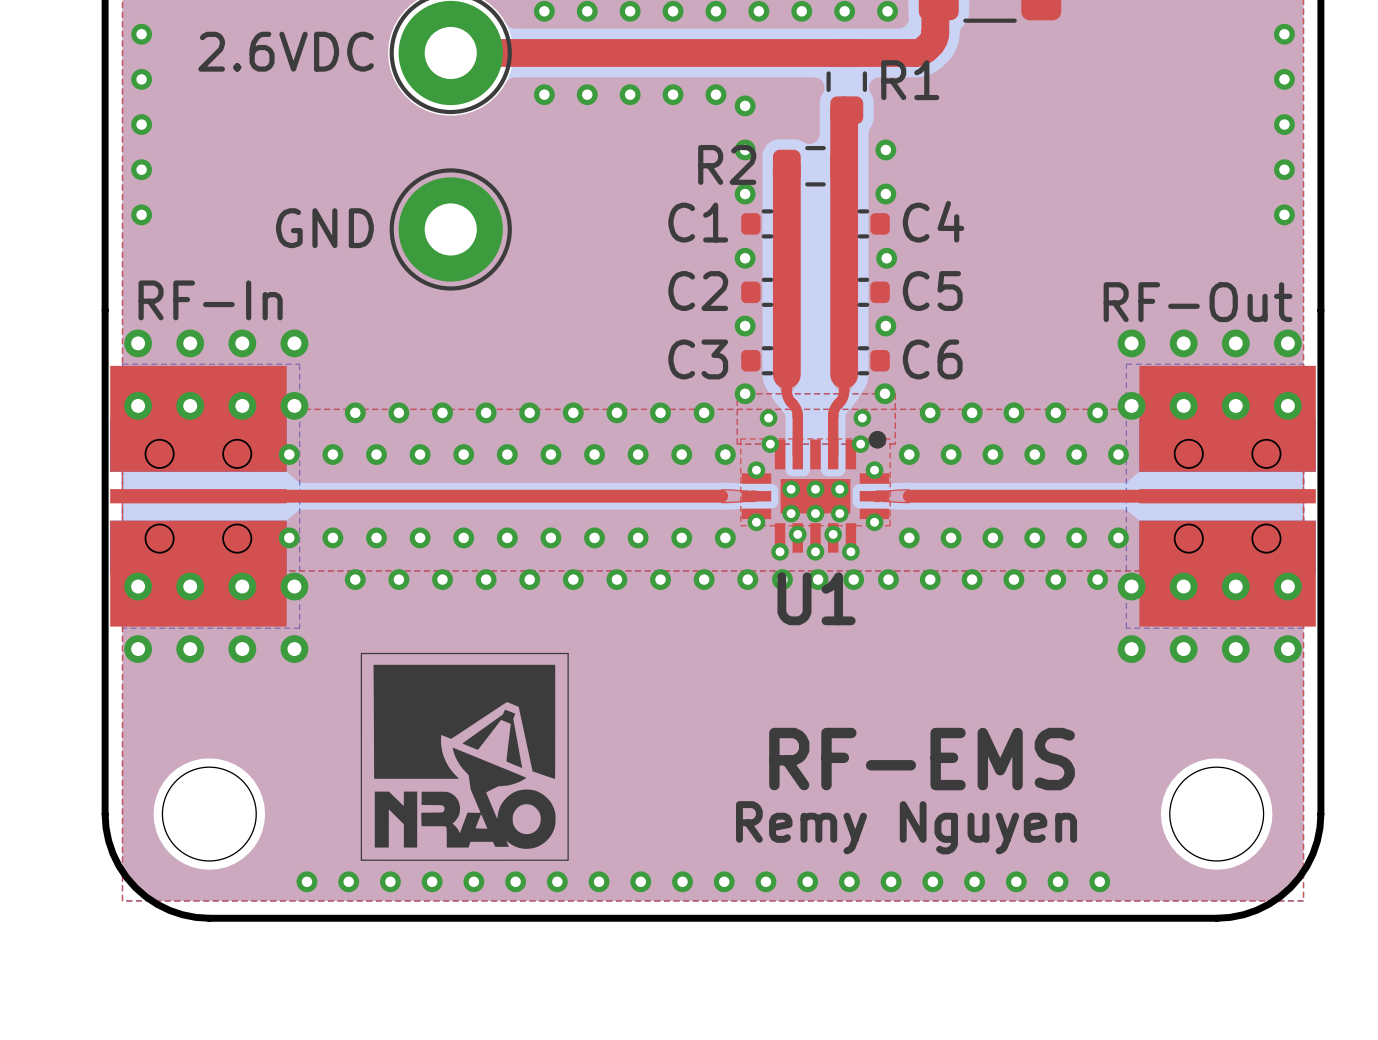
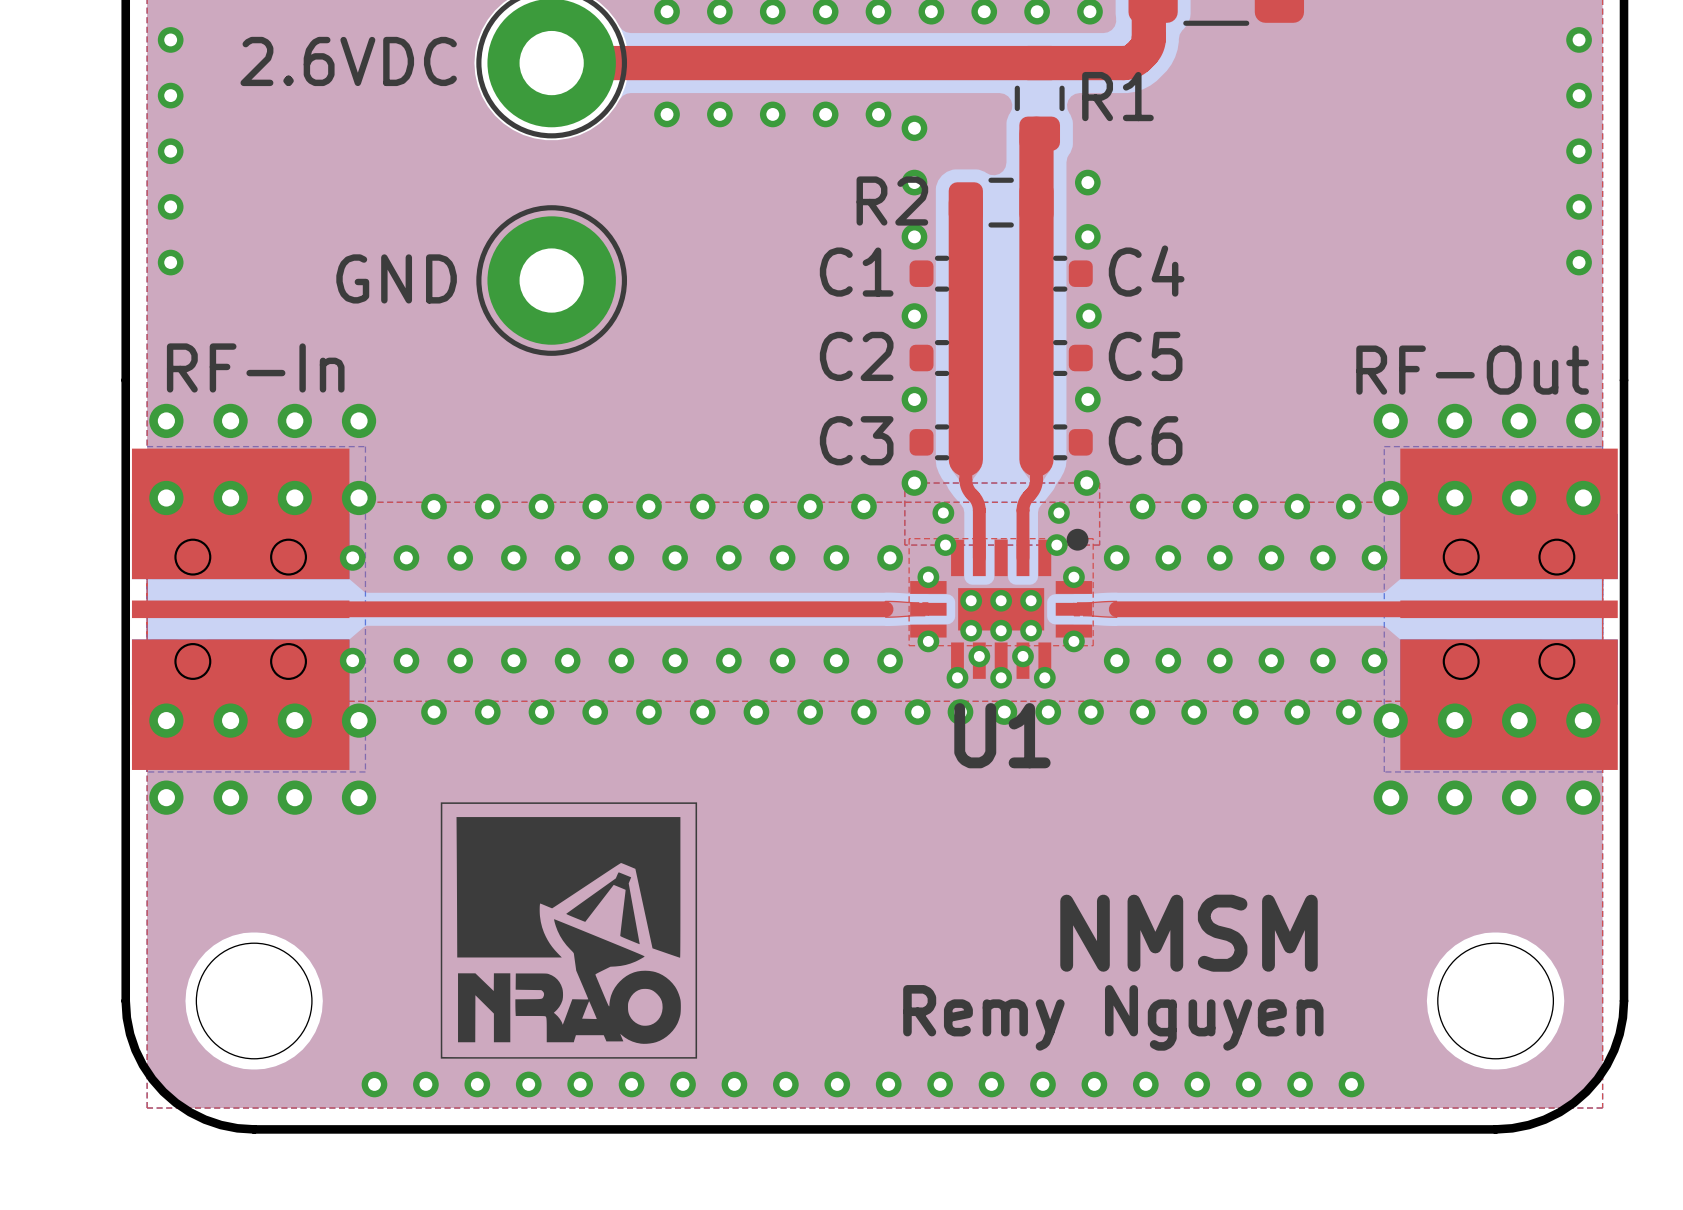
text: RF-EMS (922, 759) -> NMSM (1189, 933)

